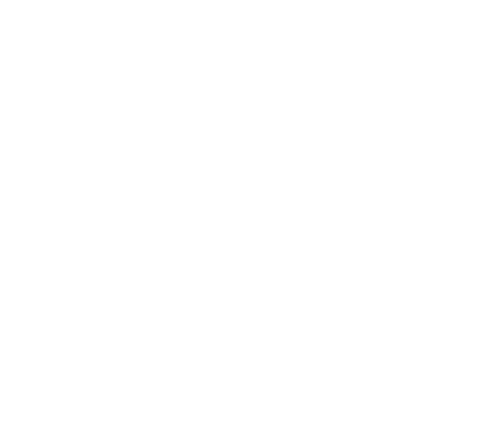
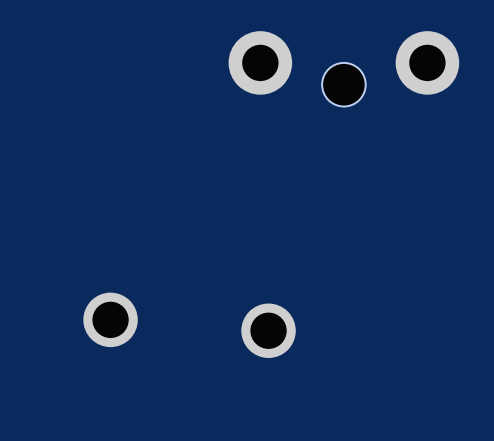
part: none -> (343, 68)
part: none -> (110, 319)
part: none -> (268, 330)

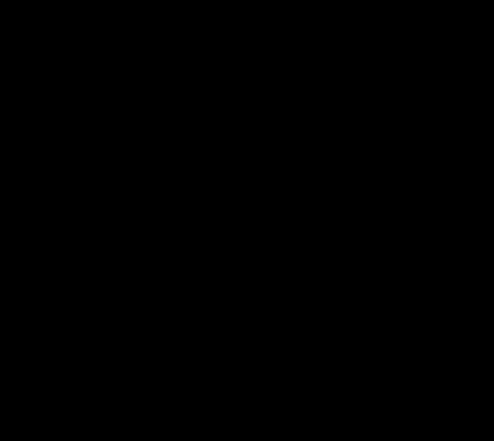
part: (343, 68) -> none
part: (110, 319) -> none
part: (268, 330) -> none

